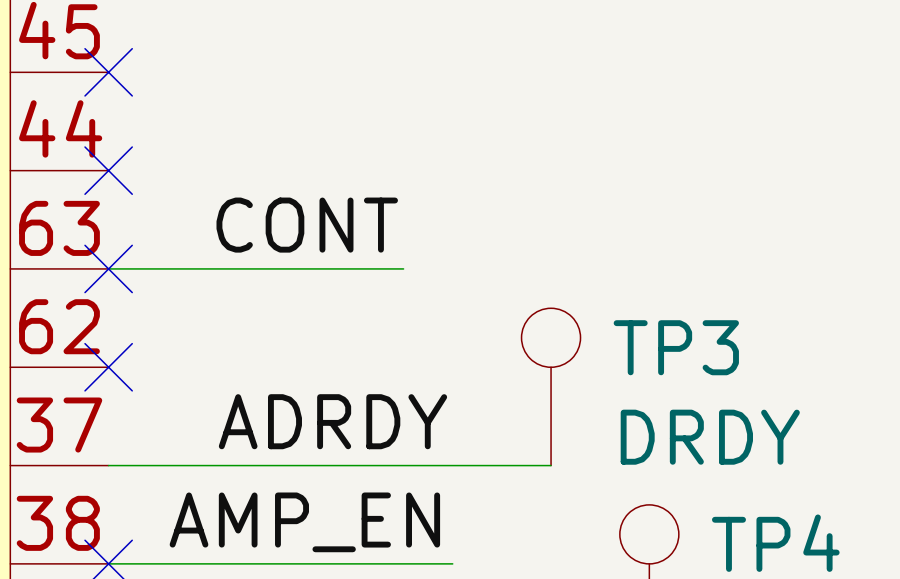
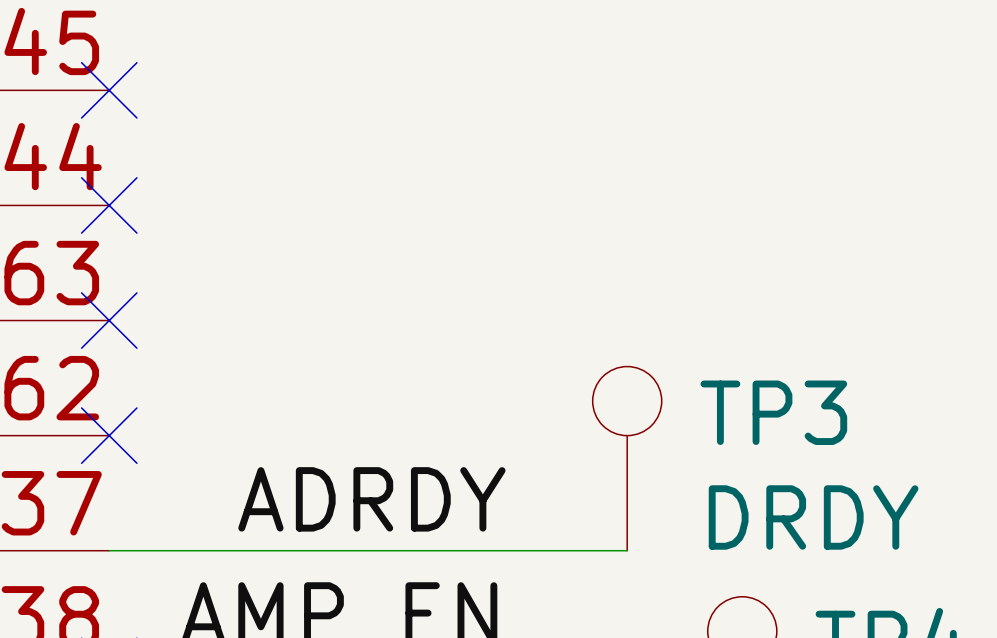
label: CONT (307, 225) -> none
wire: (108, 268) (403, 268) -> none

